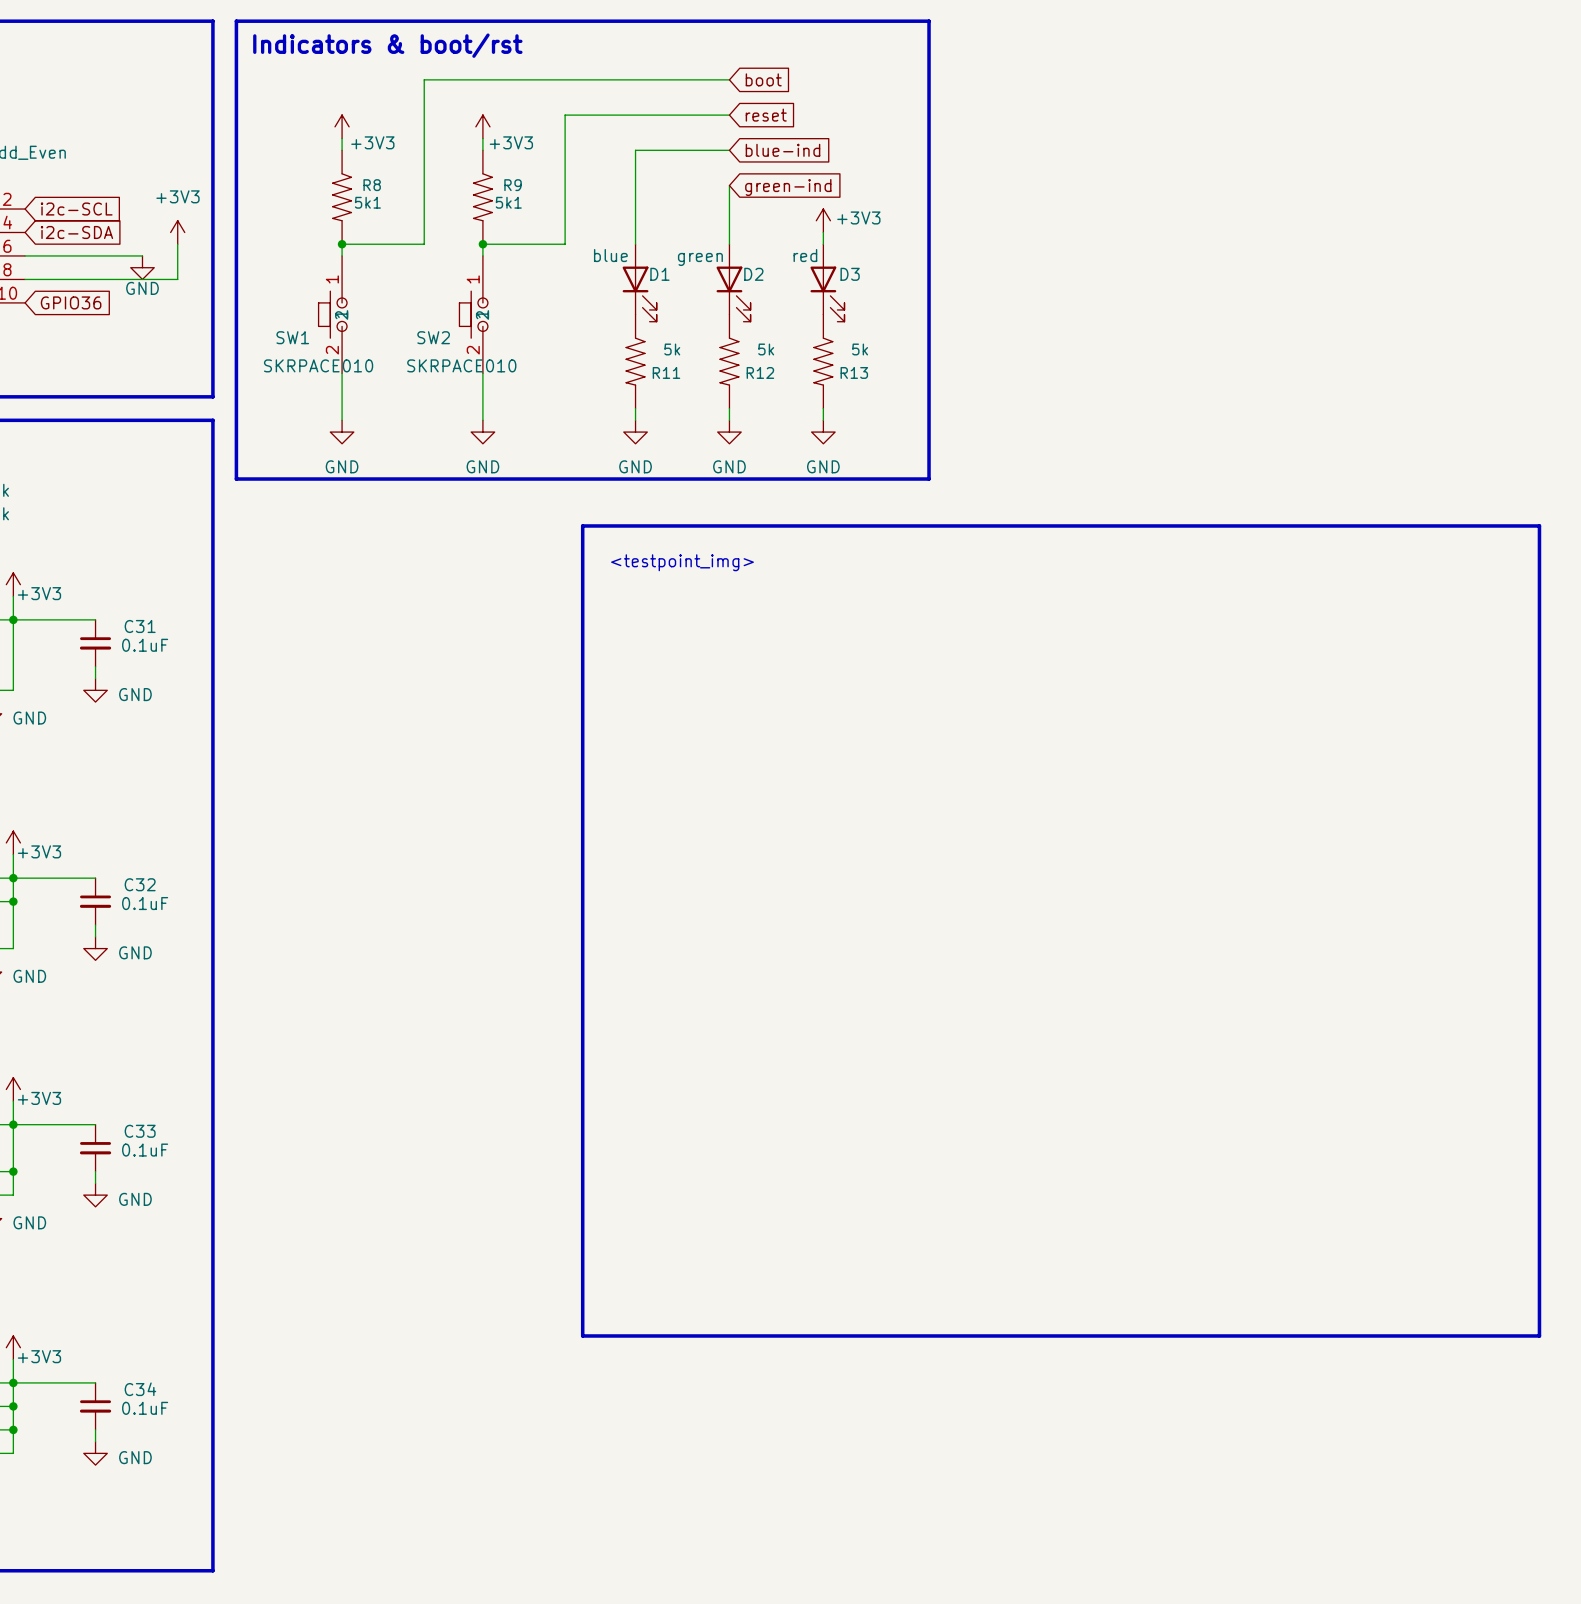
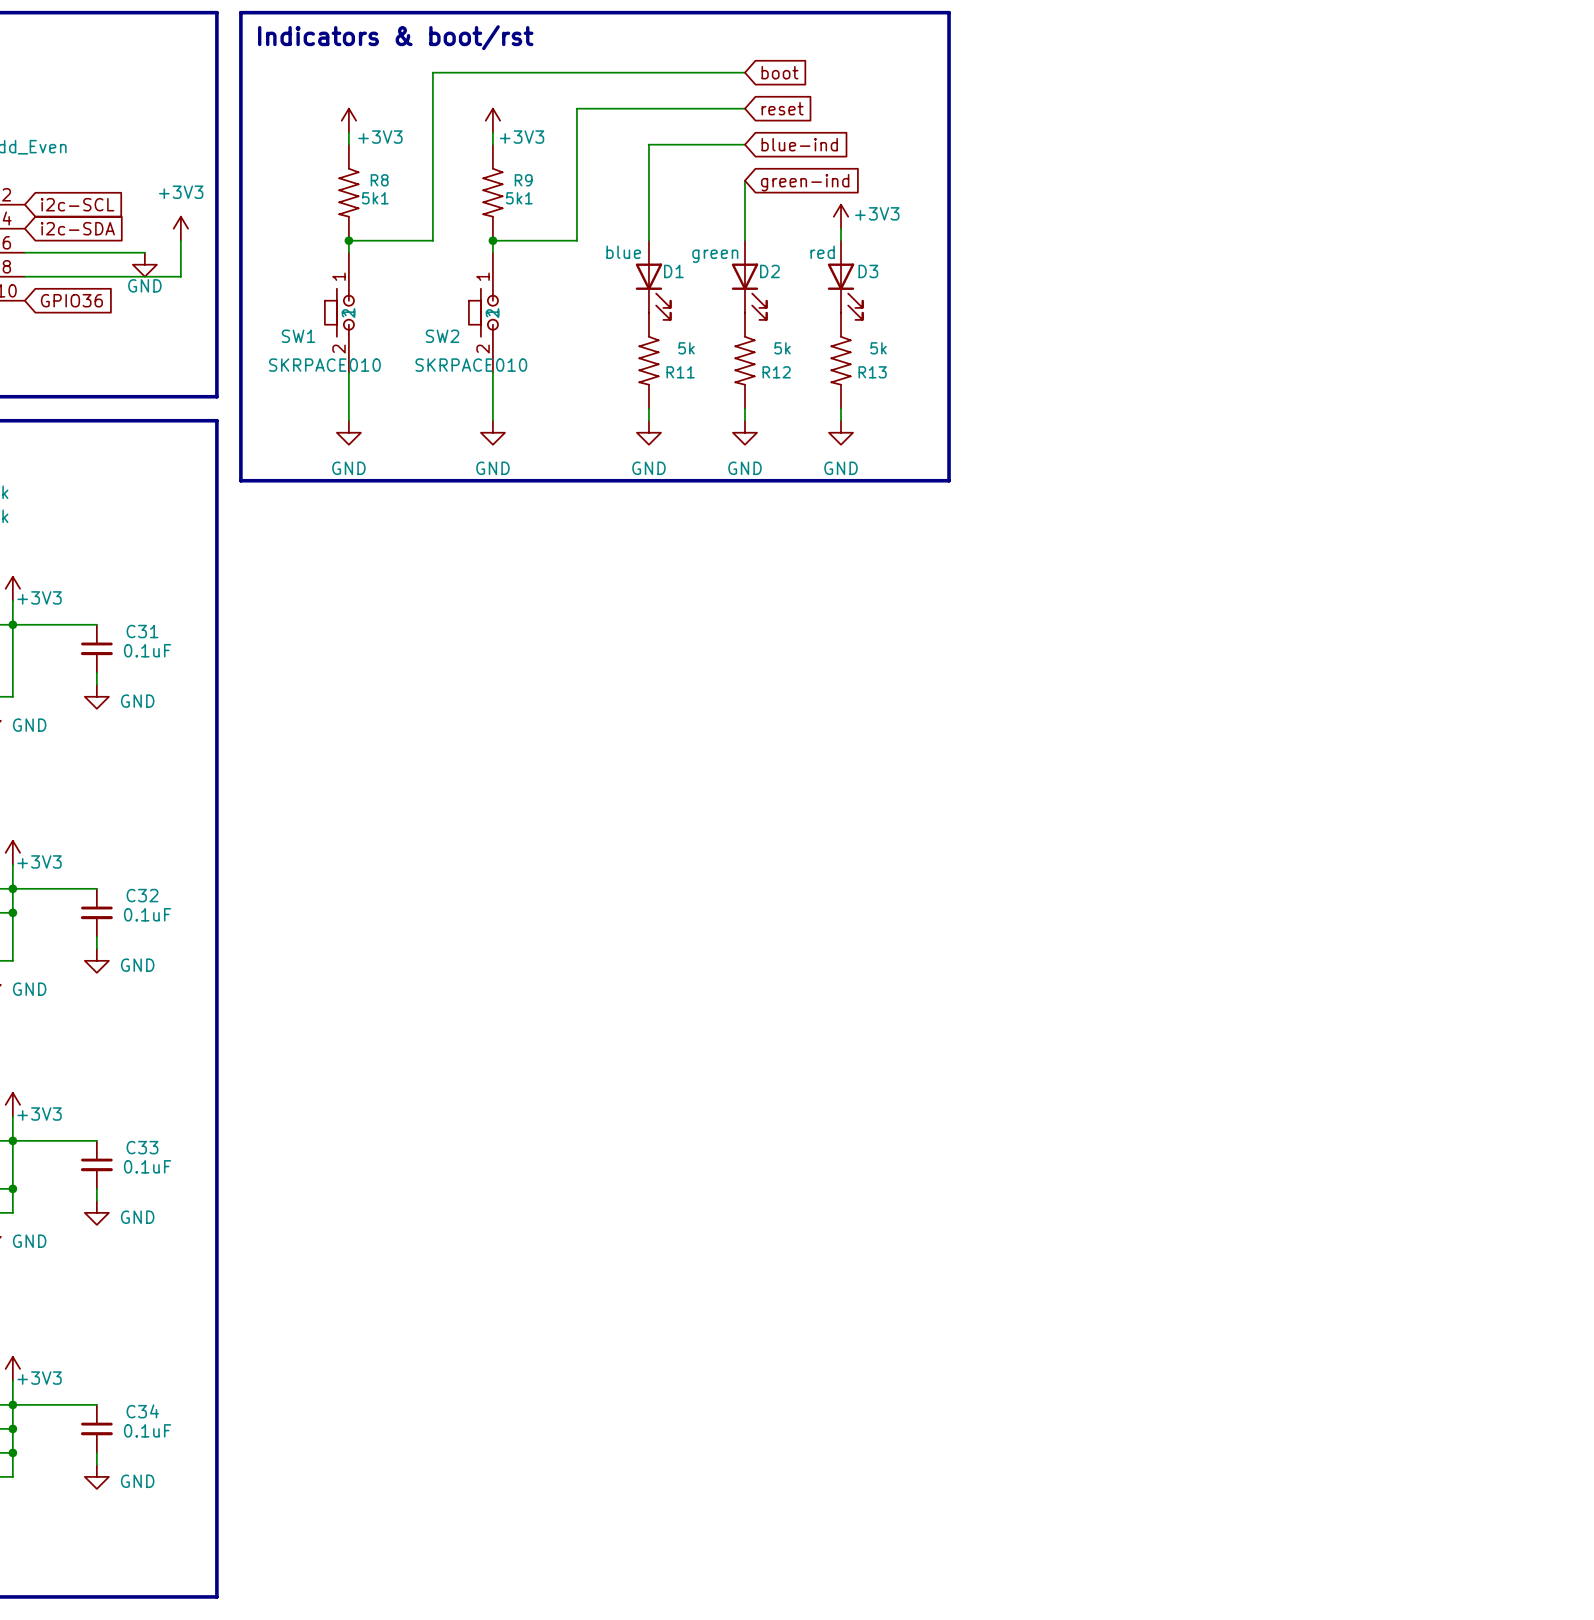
line: (582, 525) (1539, 525) (1539, 1335) (582, 1335) (582, 525) -> none
text: <testpoint_img> (682, 562) -> none

